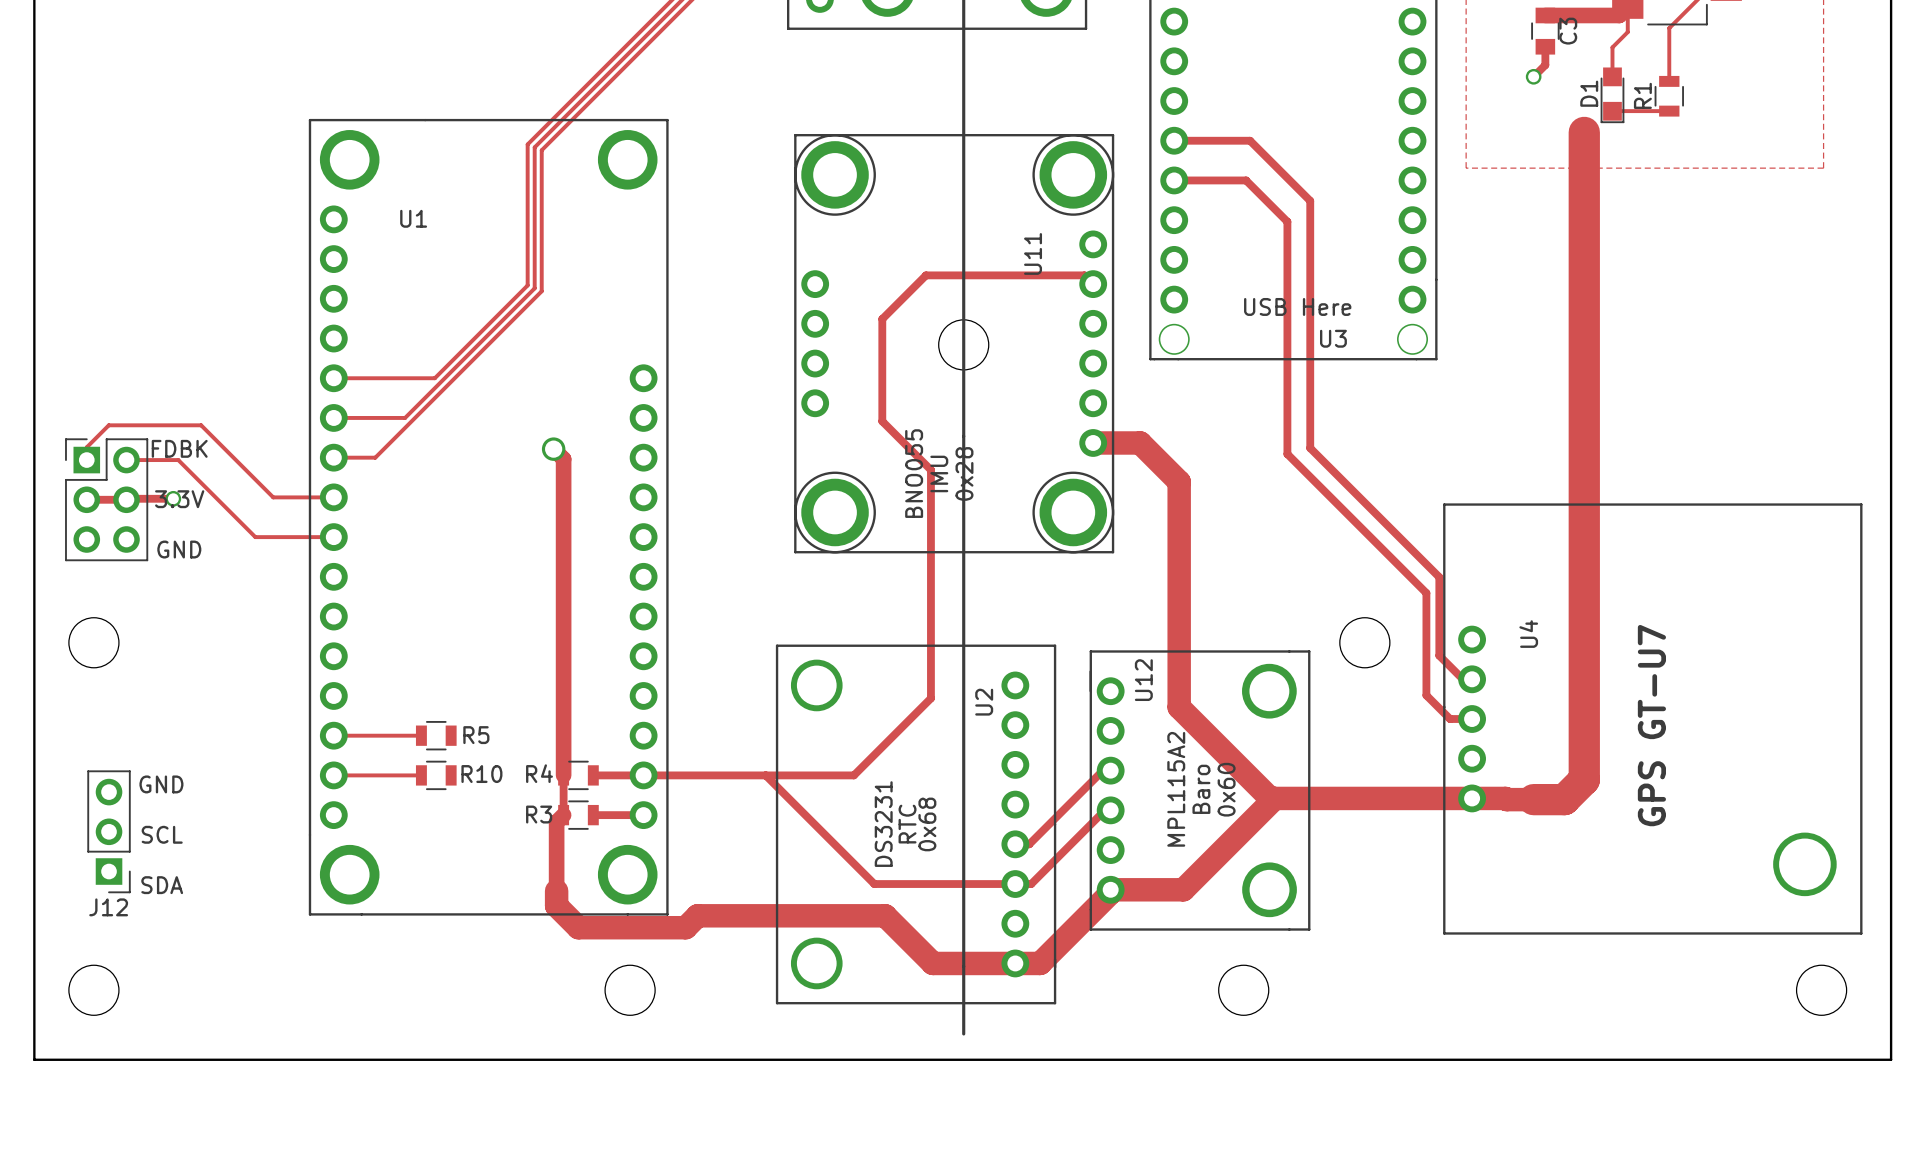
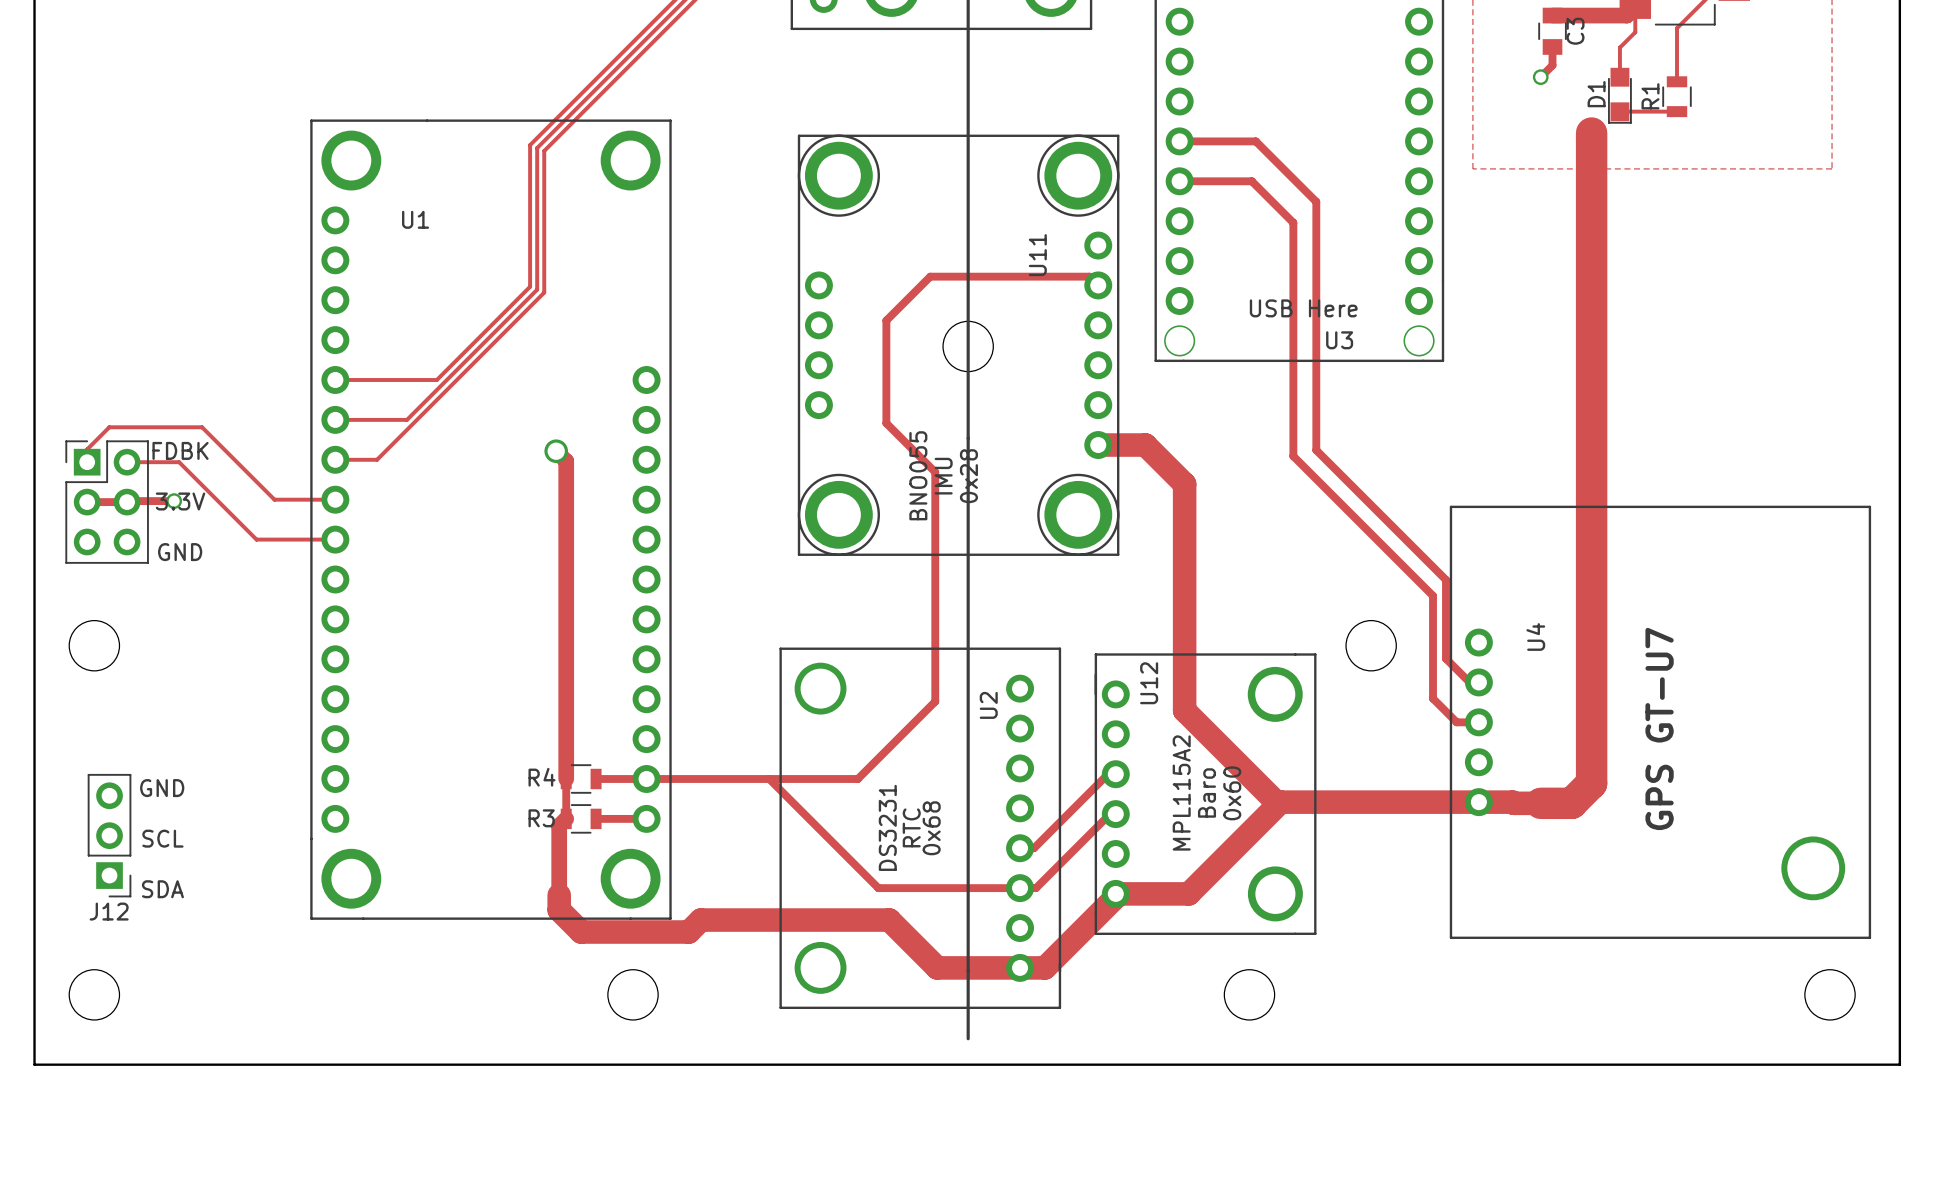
track: (333, 735) (421, 735) -> none
R5: (436, 735) -> none
track: (333, 775) (421, 775) -> none
R10: (436, 775) -> none

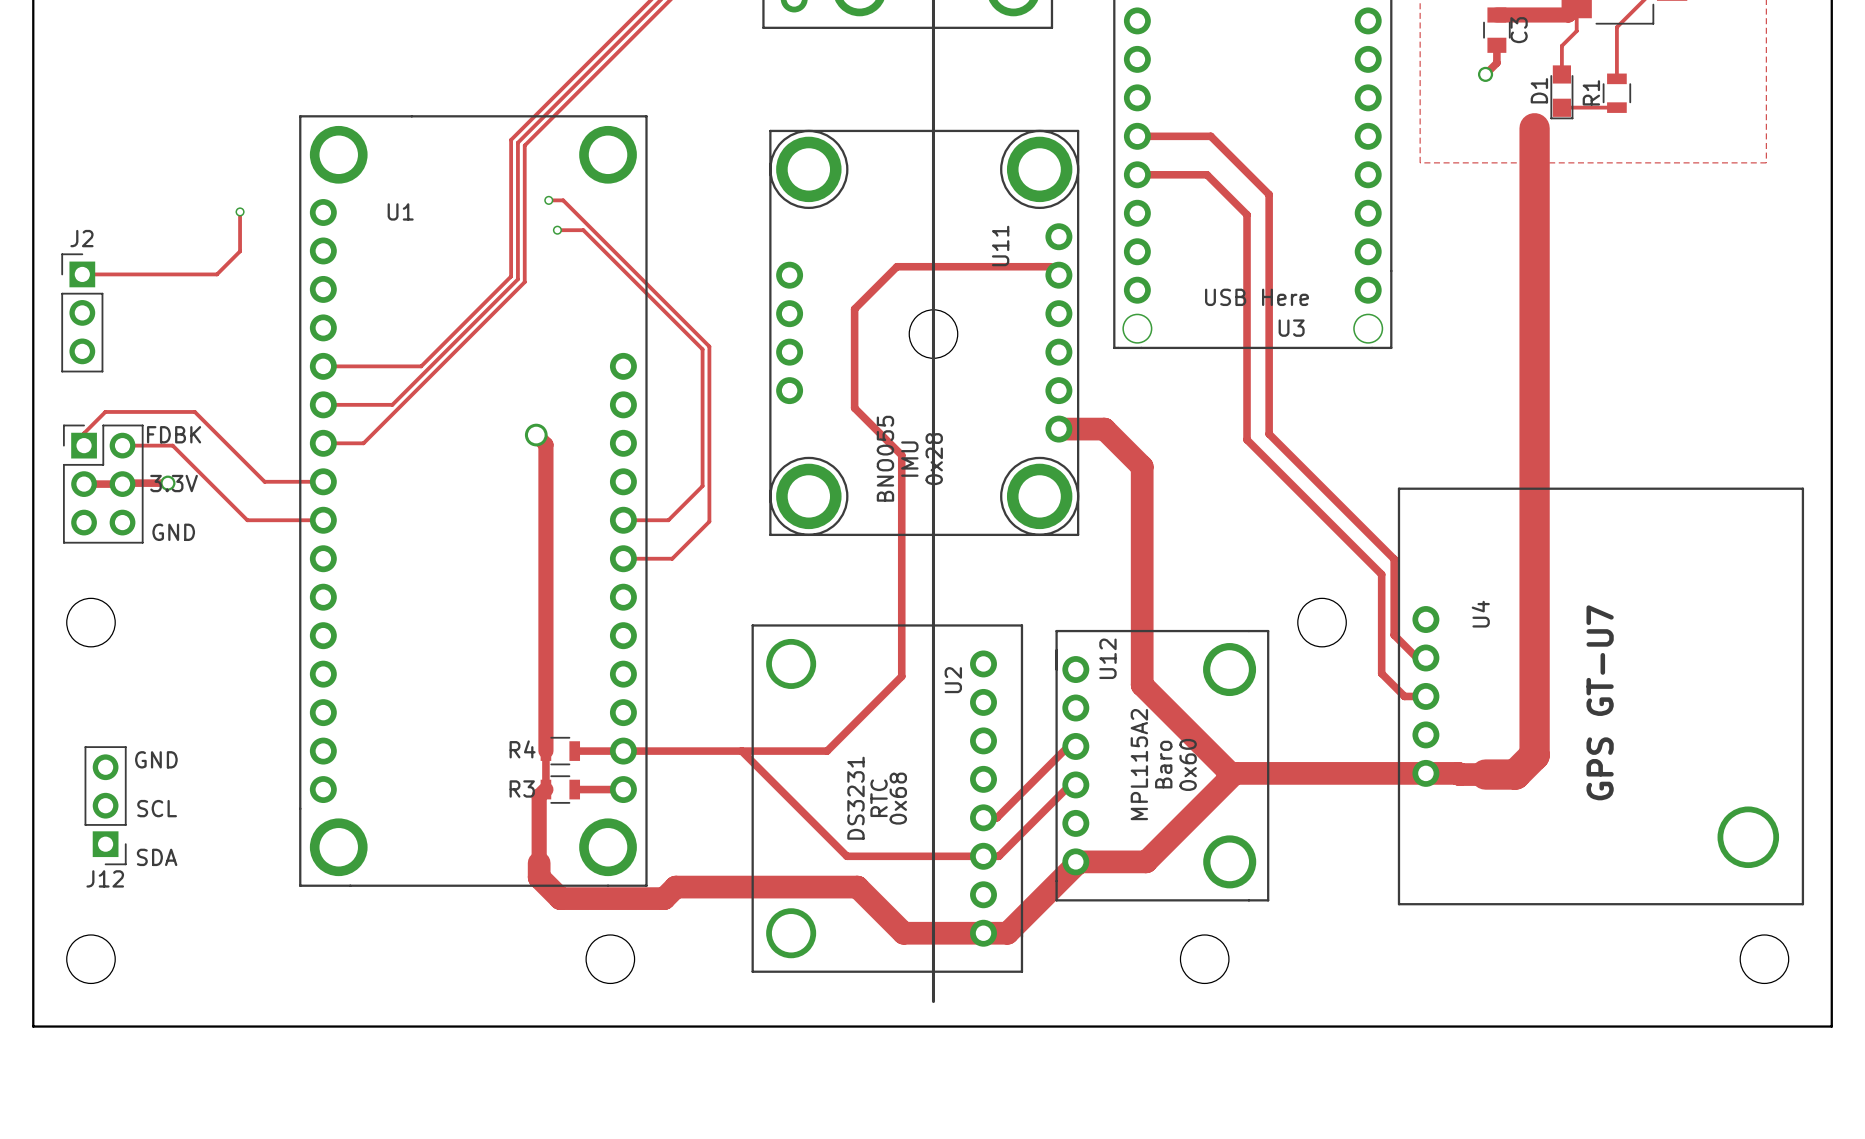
track: none -> (548, 200) (563, 200) (709, 346) (709, 521) (672, 558) (623, 558)
via: none -> (548, 200)
track: none -> (240, 211) (240, 251) (216, 274) (82, 274)
via: none -> (240, 211)
track: none -> (557, 230) (583, 230) (702, 349) (702, 486) (668, 520) (623, 520)
via: none -> (557, 230)
J2: none -> (82, 312)

